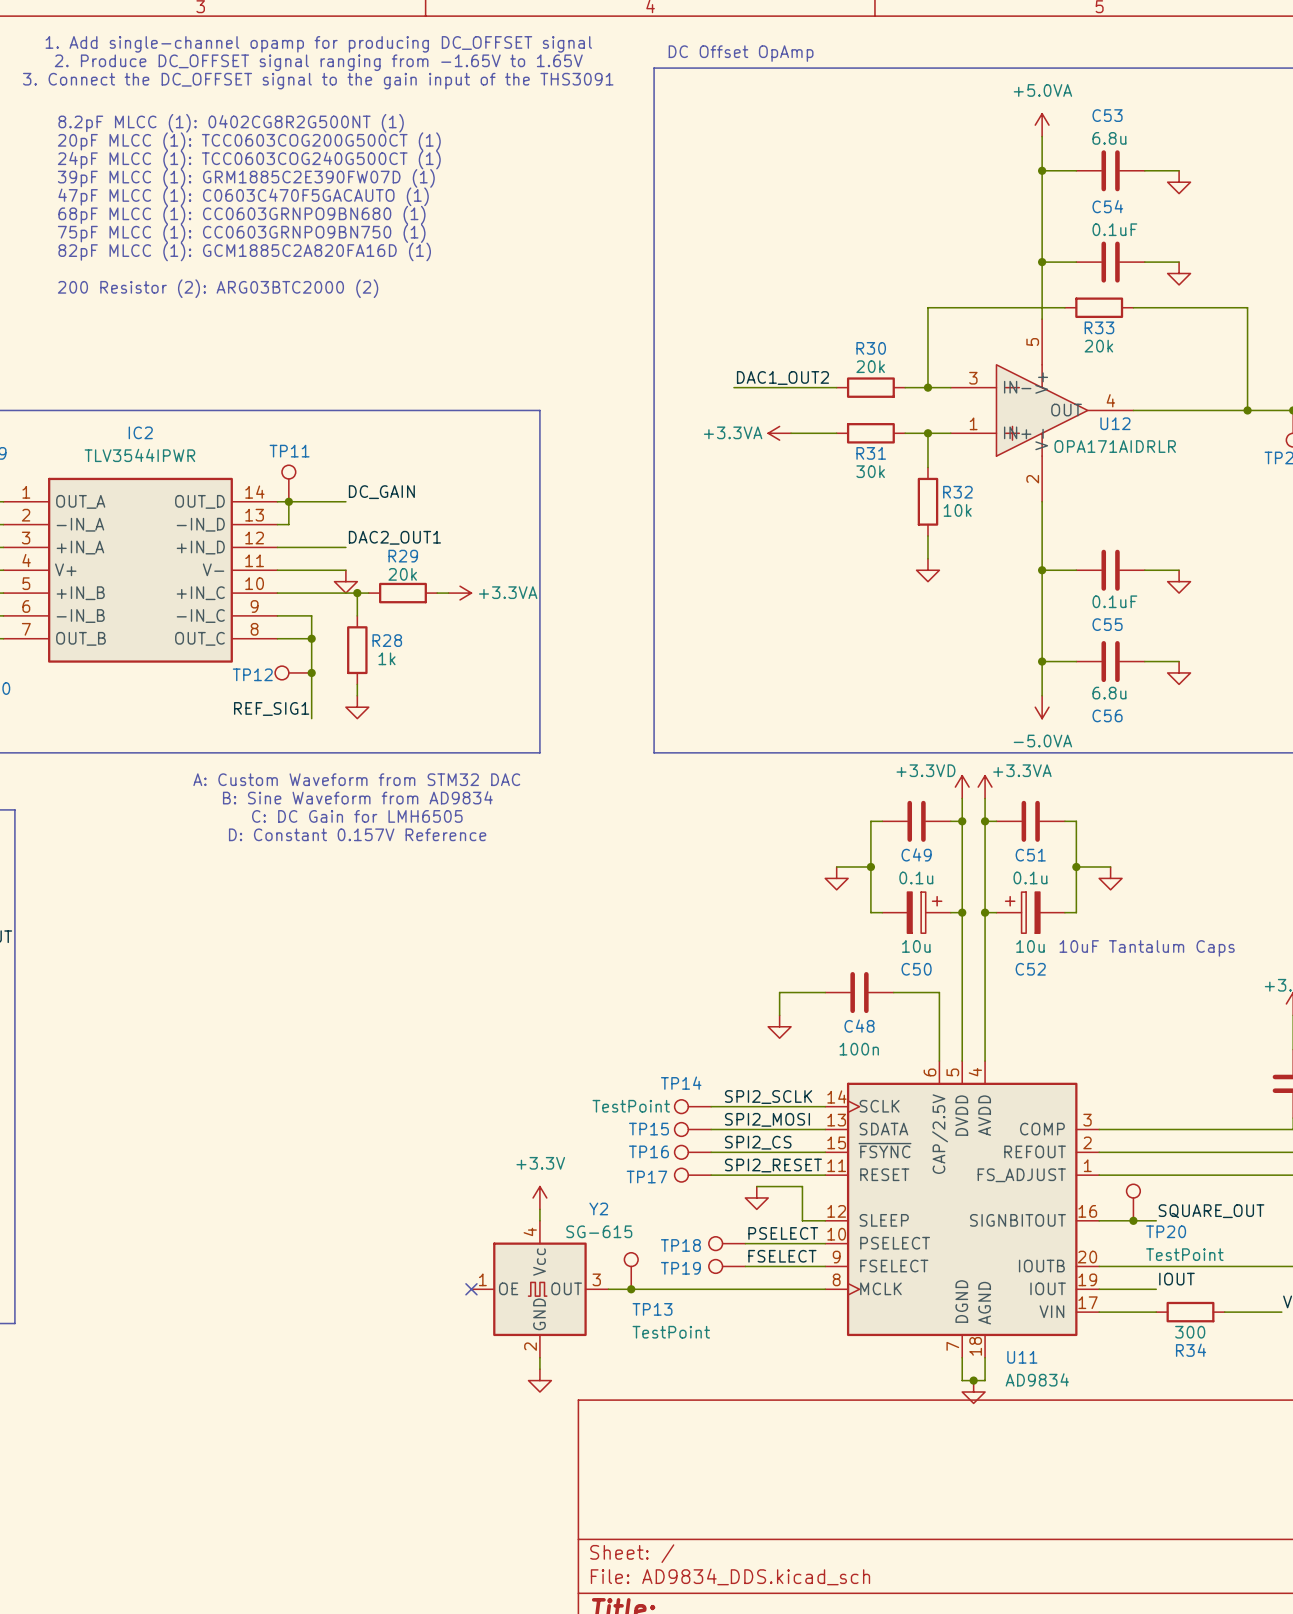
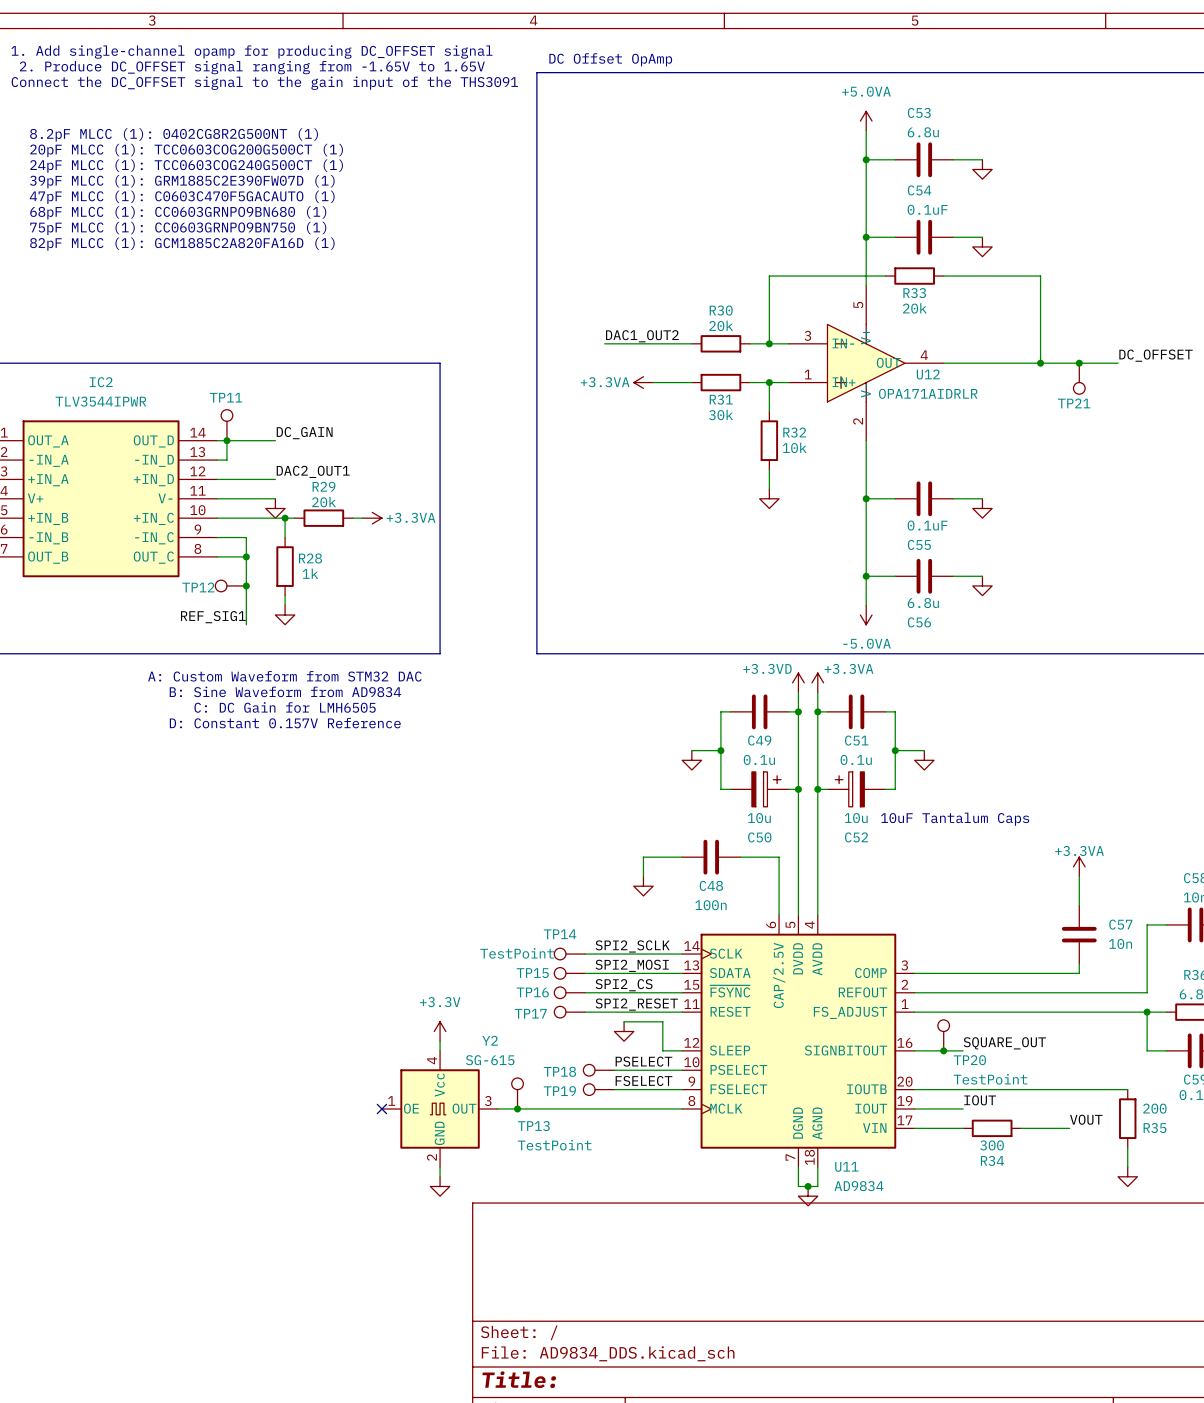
text: 8.2pF MLCC (1): 0402CG8R2G500NT (1) (231, 123) -> none
text: 20pF MLCC (1): TCC0603COG200G500CT (1) (249, 141) -> 8.2pF MLCC (1): 0402CG8R2G500NT (1) (174, 134)
text: 24pF MLCC (1): TCC0603COG240G500CT (1) (249, 160) -> 20pF MLCC (1): TCC0603COG200G500CT (1) (186, 150)
text: 39pF MLCC (1): GRM1885C2E390FW07D (1) (246, 178) -> 24pF MLCC (1): TCC0603COG240G500CT (1) (186, 166)
text: 47pF MLCC (1): C0603C470F5GACAUTO (1) (243, 196) -> 39pF MLCC (1): GRM1885C2E390FW07D (1) (182, 181)
text: 68pF MLCC (1): CC0603GRNPO9BN680 (1) (241, 215) -> 47pF MLCC (1): C0603C470F5GACAUTO (1) (182, 197)
text: 75pF MLCC (1): CC0603GRNPO9BN750 (1) (241, 233) -> 68pF MLCC (1): CC0603GRNPO9BN680 (1) (178, 212)
text: 82pF MLCC (1): GCM1885C2A820FA16D (1) (244, 251) -> 75pF MLCC (1): CC0603GRNPO9BN750 (1) (178, 228)
text: none -> 82pF MLCC (1): GCM1885C2A820FA16D (1) (182, 244)
text: 200 Resistor (2): ARG03BTC2000 (2) (218, 288) -> none

